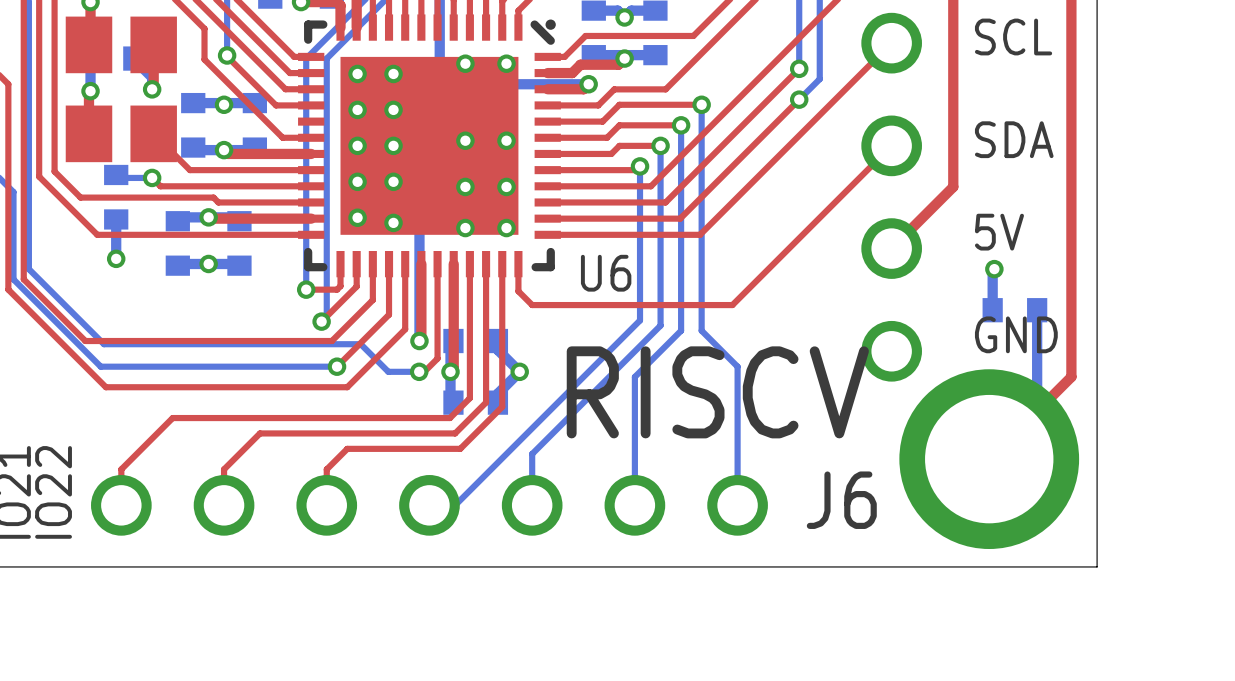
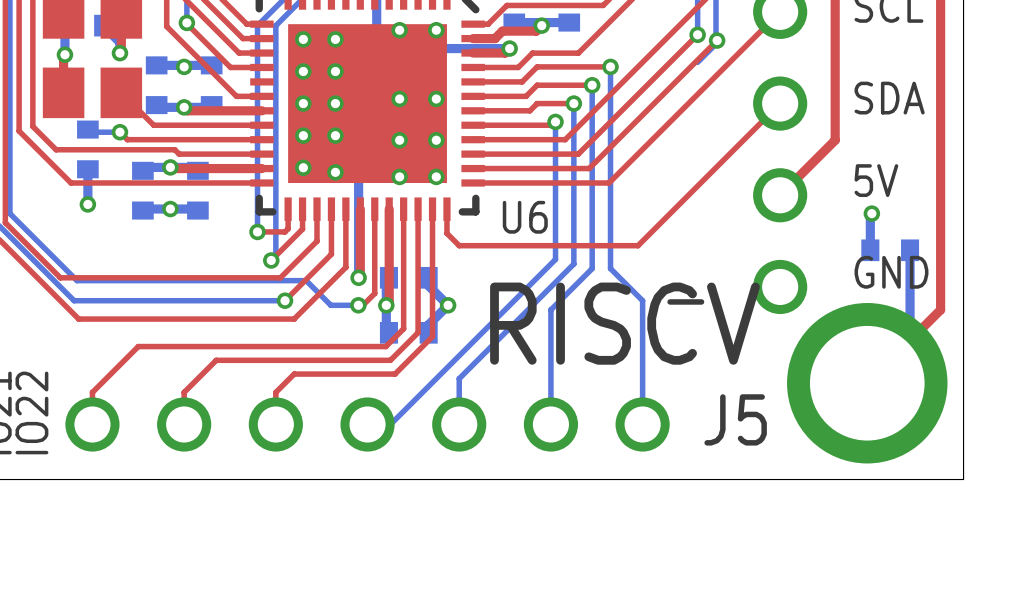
top track: (799, 99) (680, 218) (677, 218) -> (717, 40) (589, 168)
via position: (799, 99) -> (717, 40)
text: none -> - (685, 301)
J6 name: J6 (841, 500) -> J5 (735, 419)

